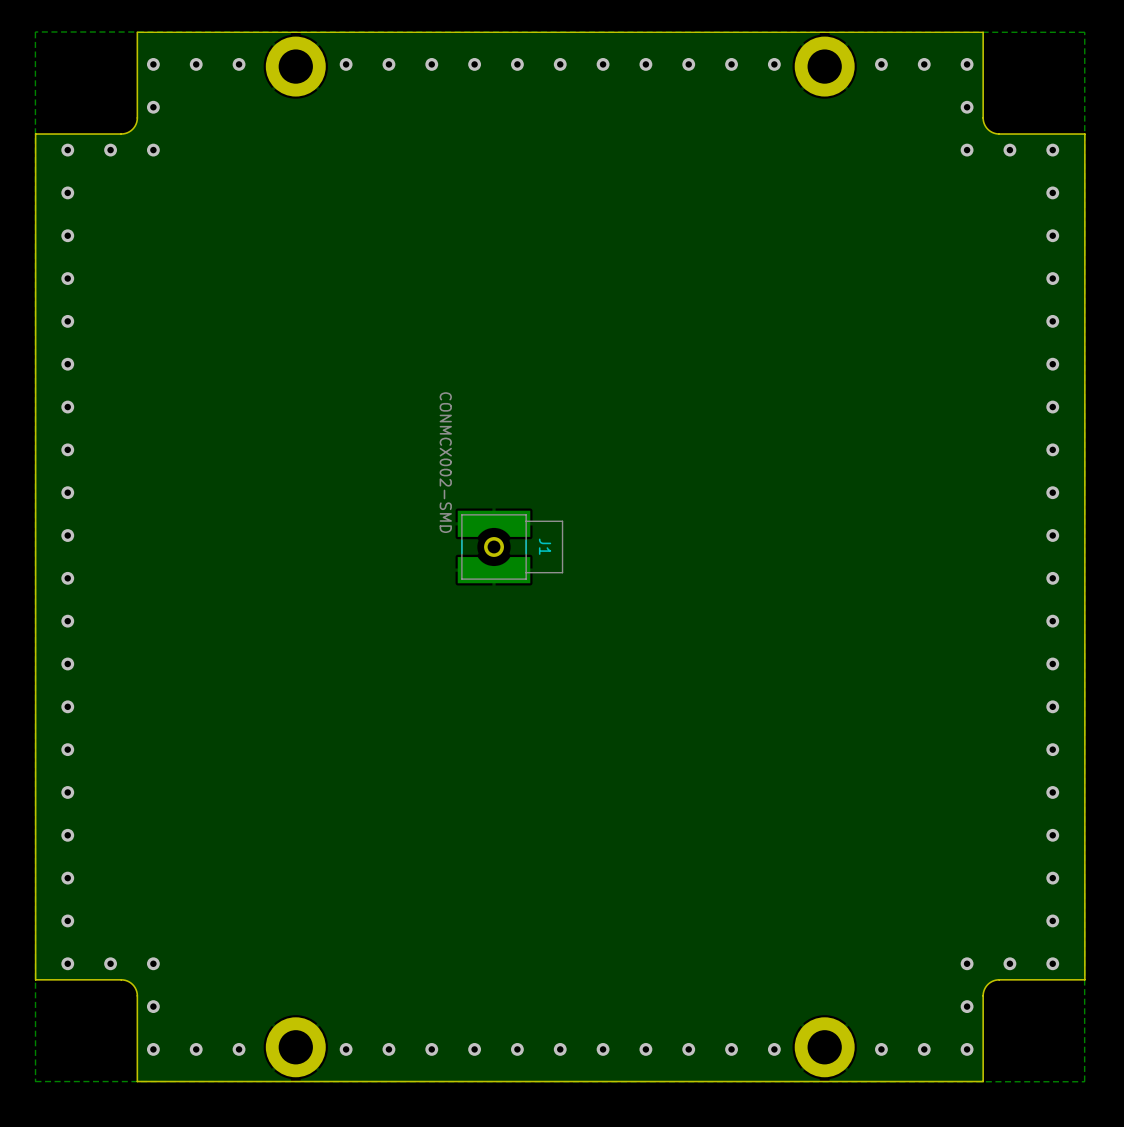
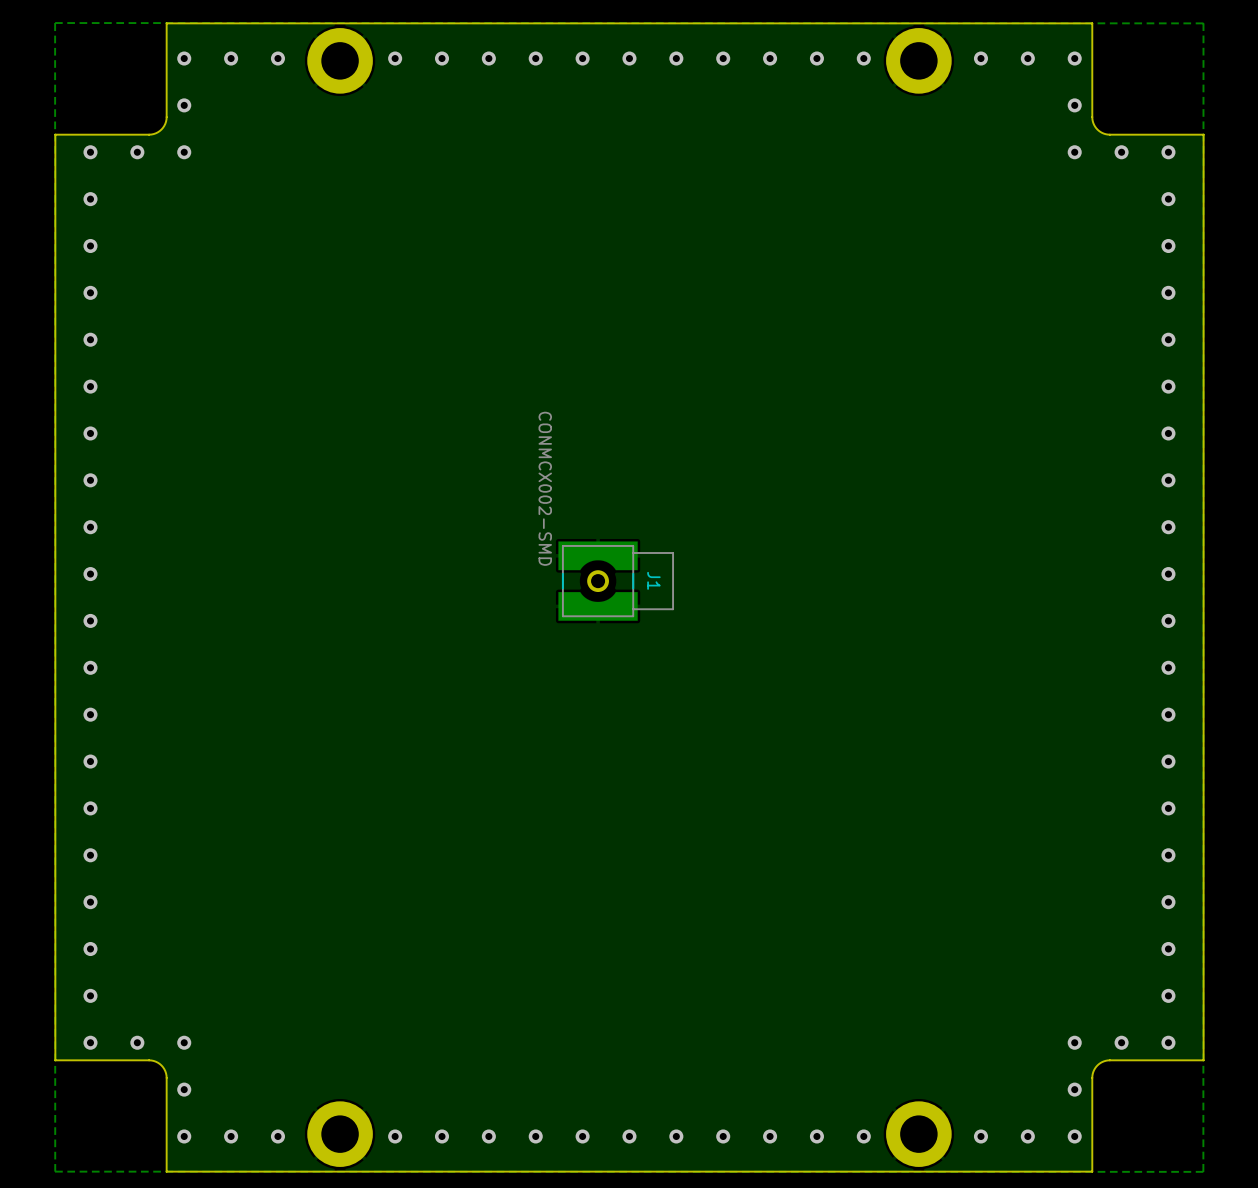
J1 position: (510, 546) -> (616, 581)

